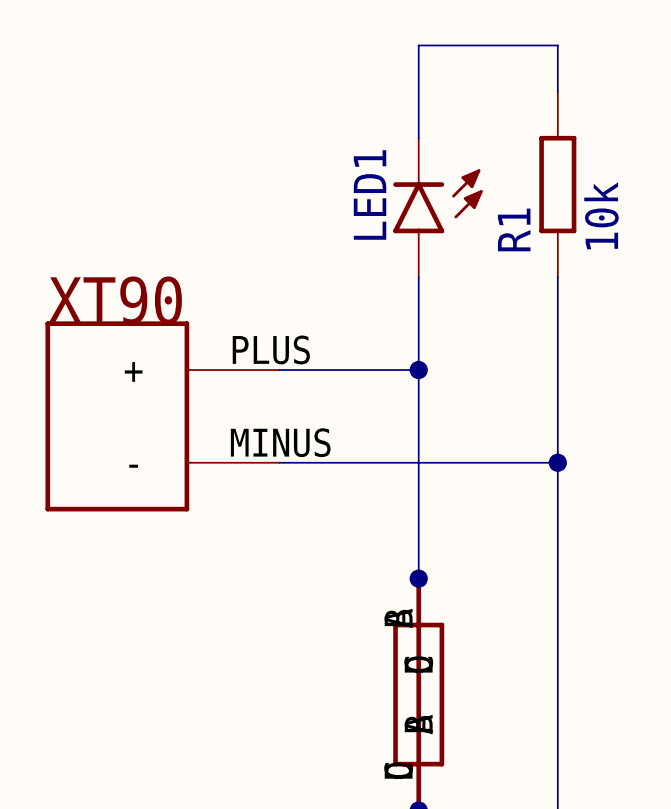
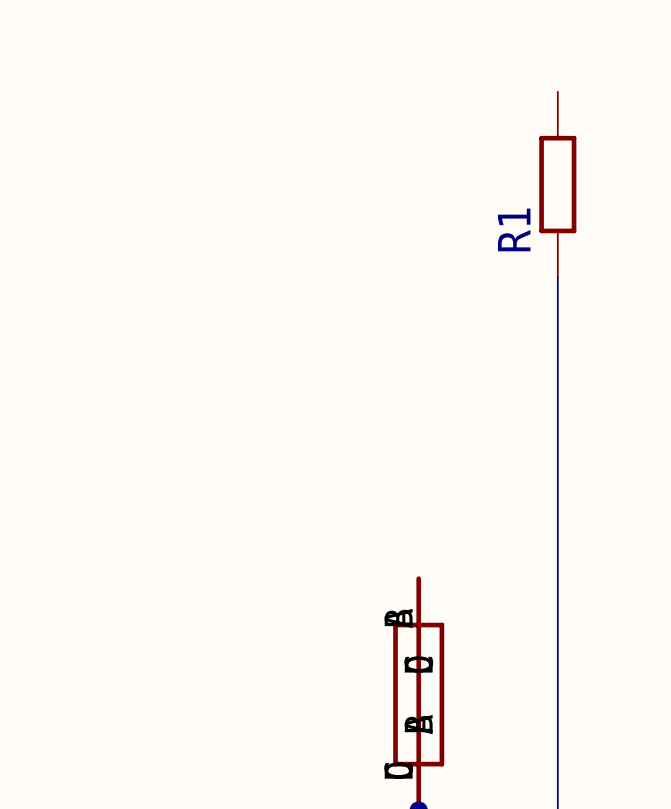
wire: (557, 91) (557, 45) (418, 45) (418, 138) -> none
LED1: (437, 207) -> none
R1 value: 10k (601, 215) -> none
wire: (418, 277) (418, 578) -> none
wire: (279, 370) (418, 370) -> none
junction: (418, 370) -> none
part: (162, 416) -> none
wire: (279, 462) (557, 462) -> none
junction: (557, 462) -> none
junction: (418, 578) -> none

